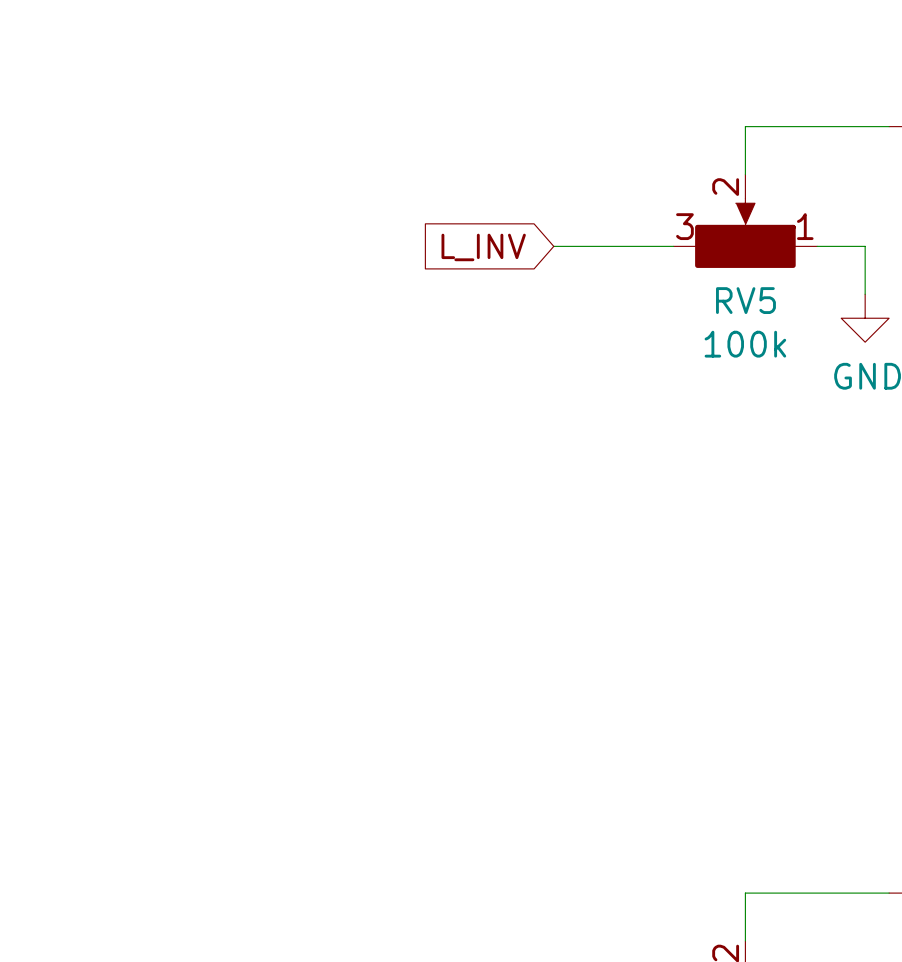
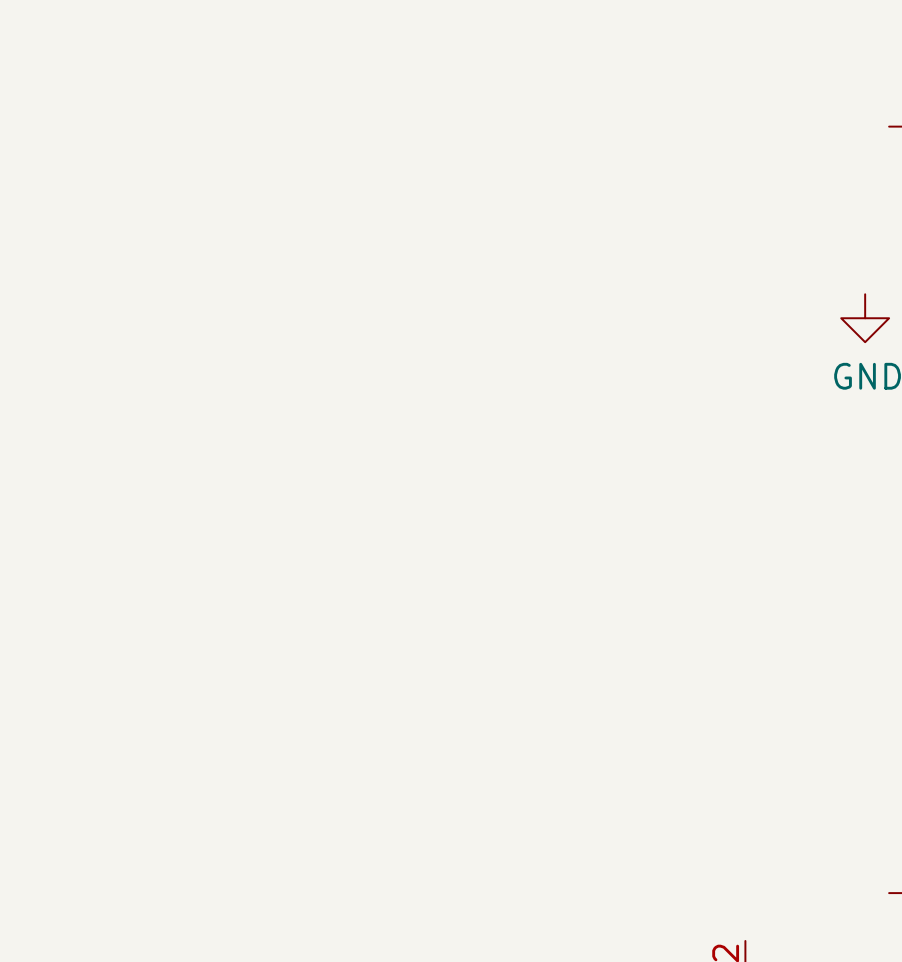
wire: (889, 126) (745, 126) (745, 174) -> none
RV5: 100k (745, 221) -> none
wire: (553, 246) (673, 246) -> none
wire: (817, 246) (865, 246) (865, 294) -> none
global label: L_INV (483, 247) -> none
wire: (889, 893) (745, 893) (745, 940) -> none

